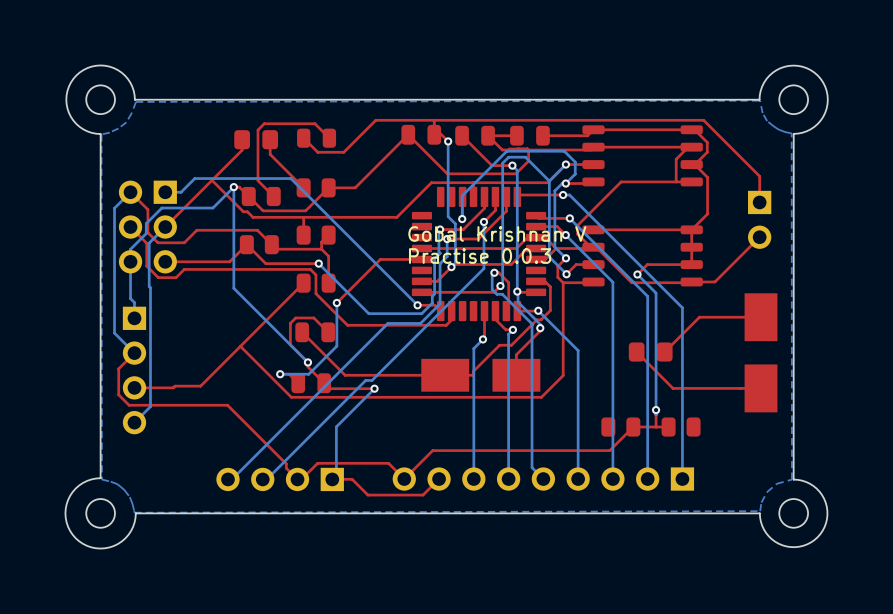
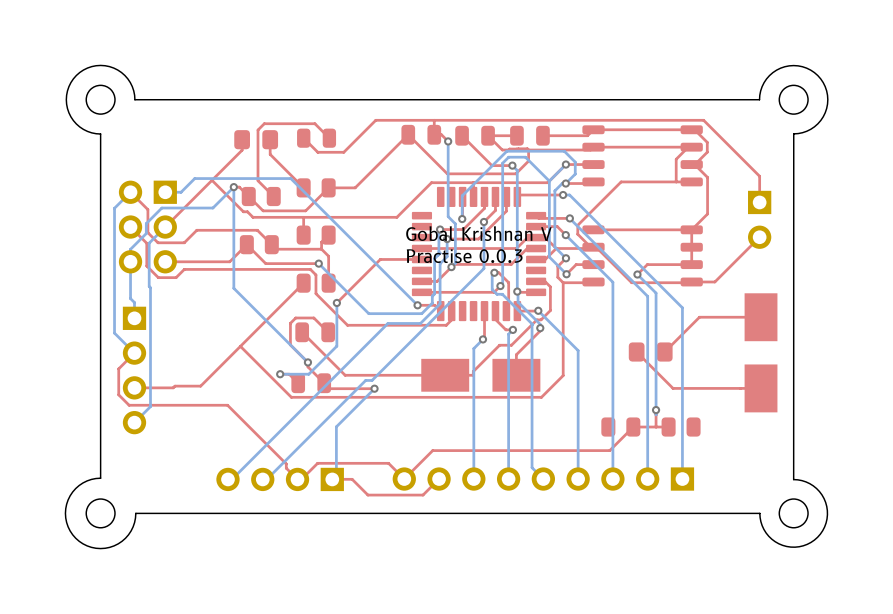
bottom zone outline: (760, 100) (762, 113) (767, 121) (778, 129) (791, 133) (791, 479) (776, 483) (767, 492) (761, 502) (760, 511) (134, 512) (129, 497) (124, 490) (117, 484) (102, 479) (101, 134) (118, 128) (126, 122) (136, 101) (760, 100) -> none

